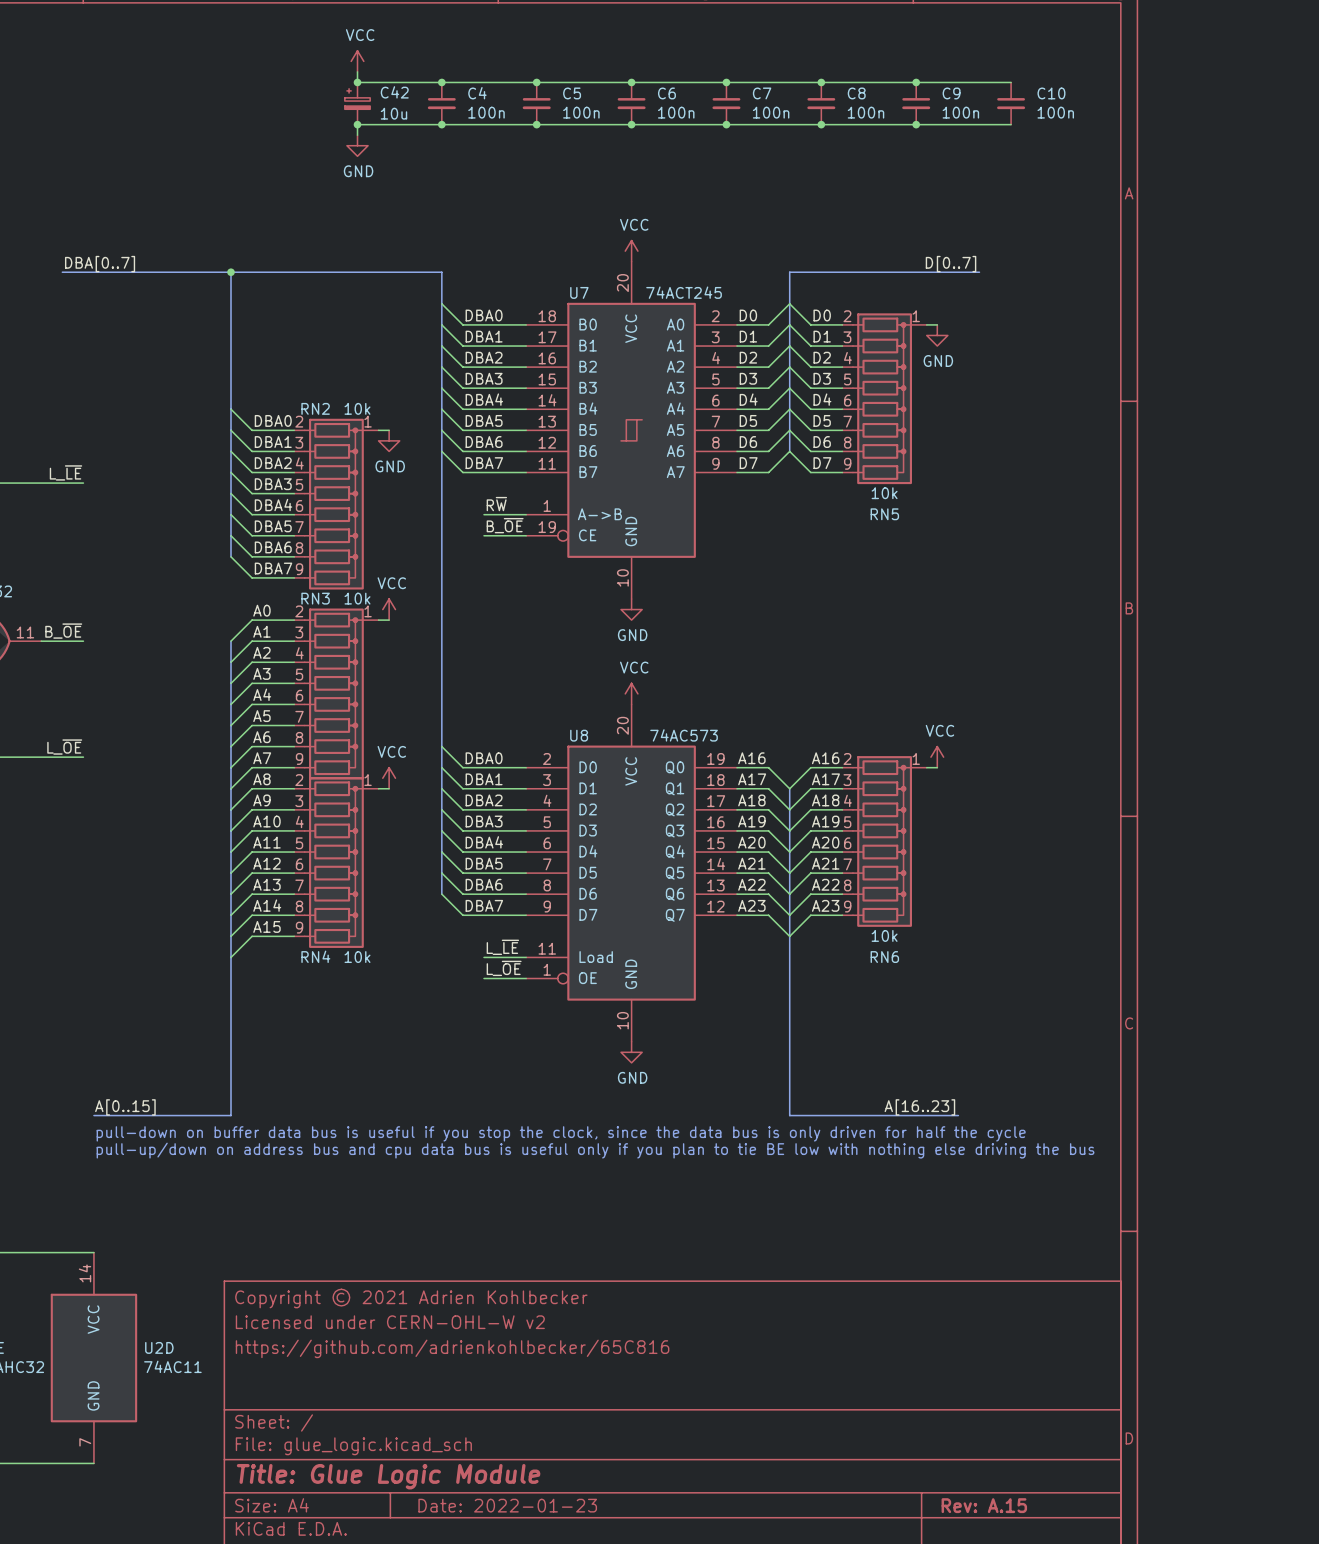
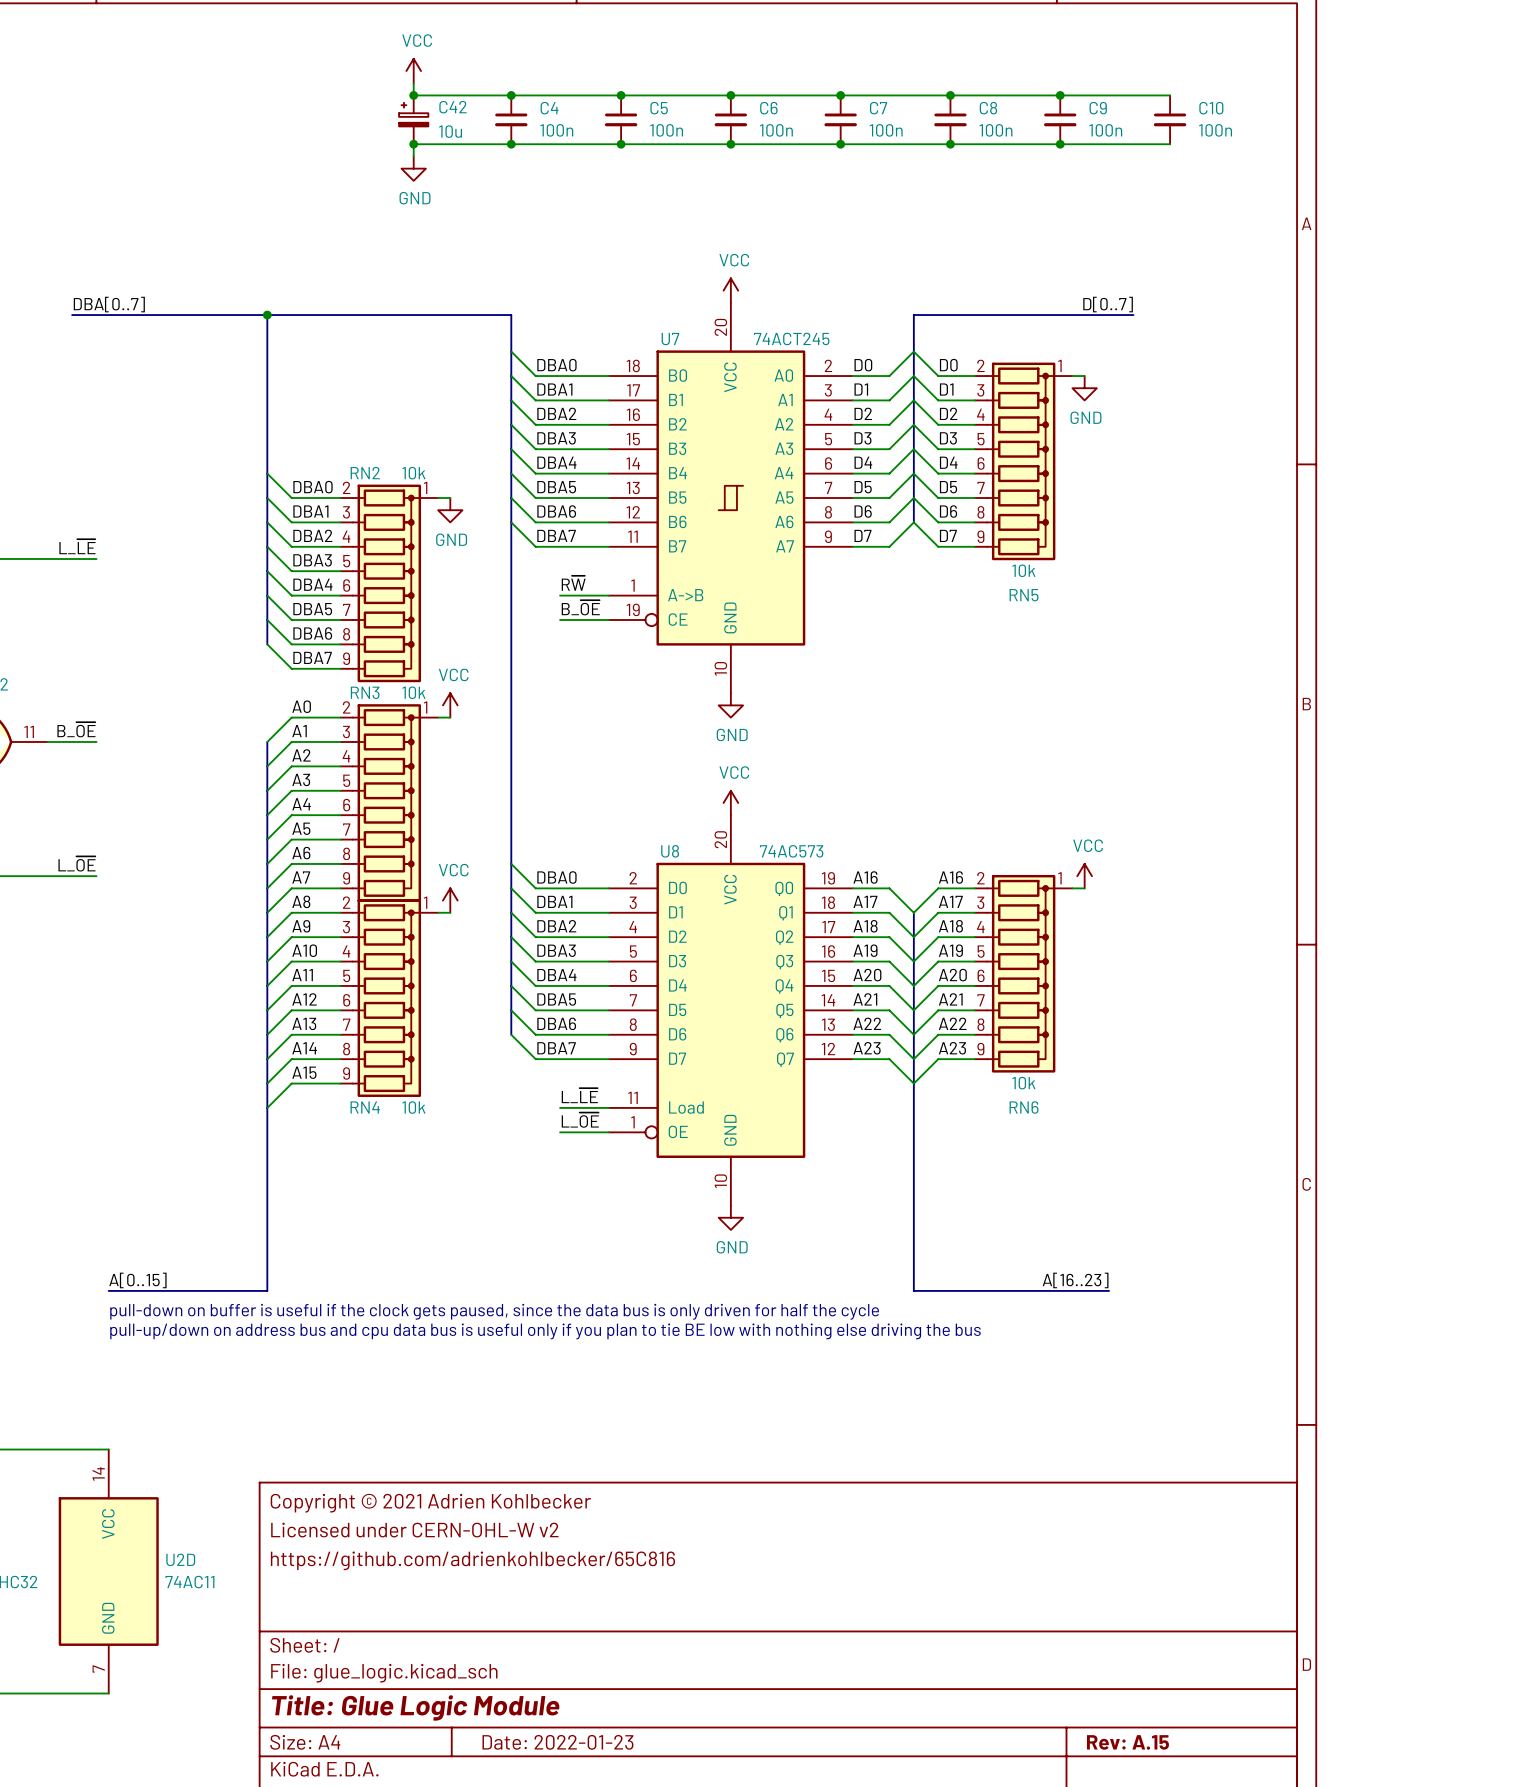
text: pull-down on buffer data bus is useful if you stop the clock, since the data bus is only driven for half the cycle (561, 1133) -> pull-down on buffer is useful if the clock gets paused, since the data bus is only driven for half the cycle (494, 1311)

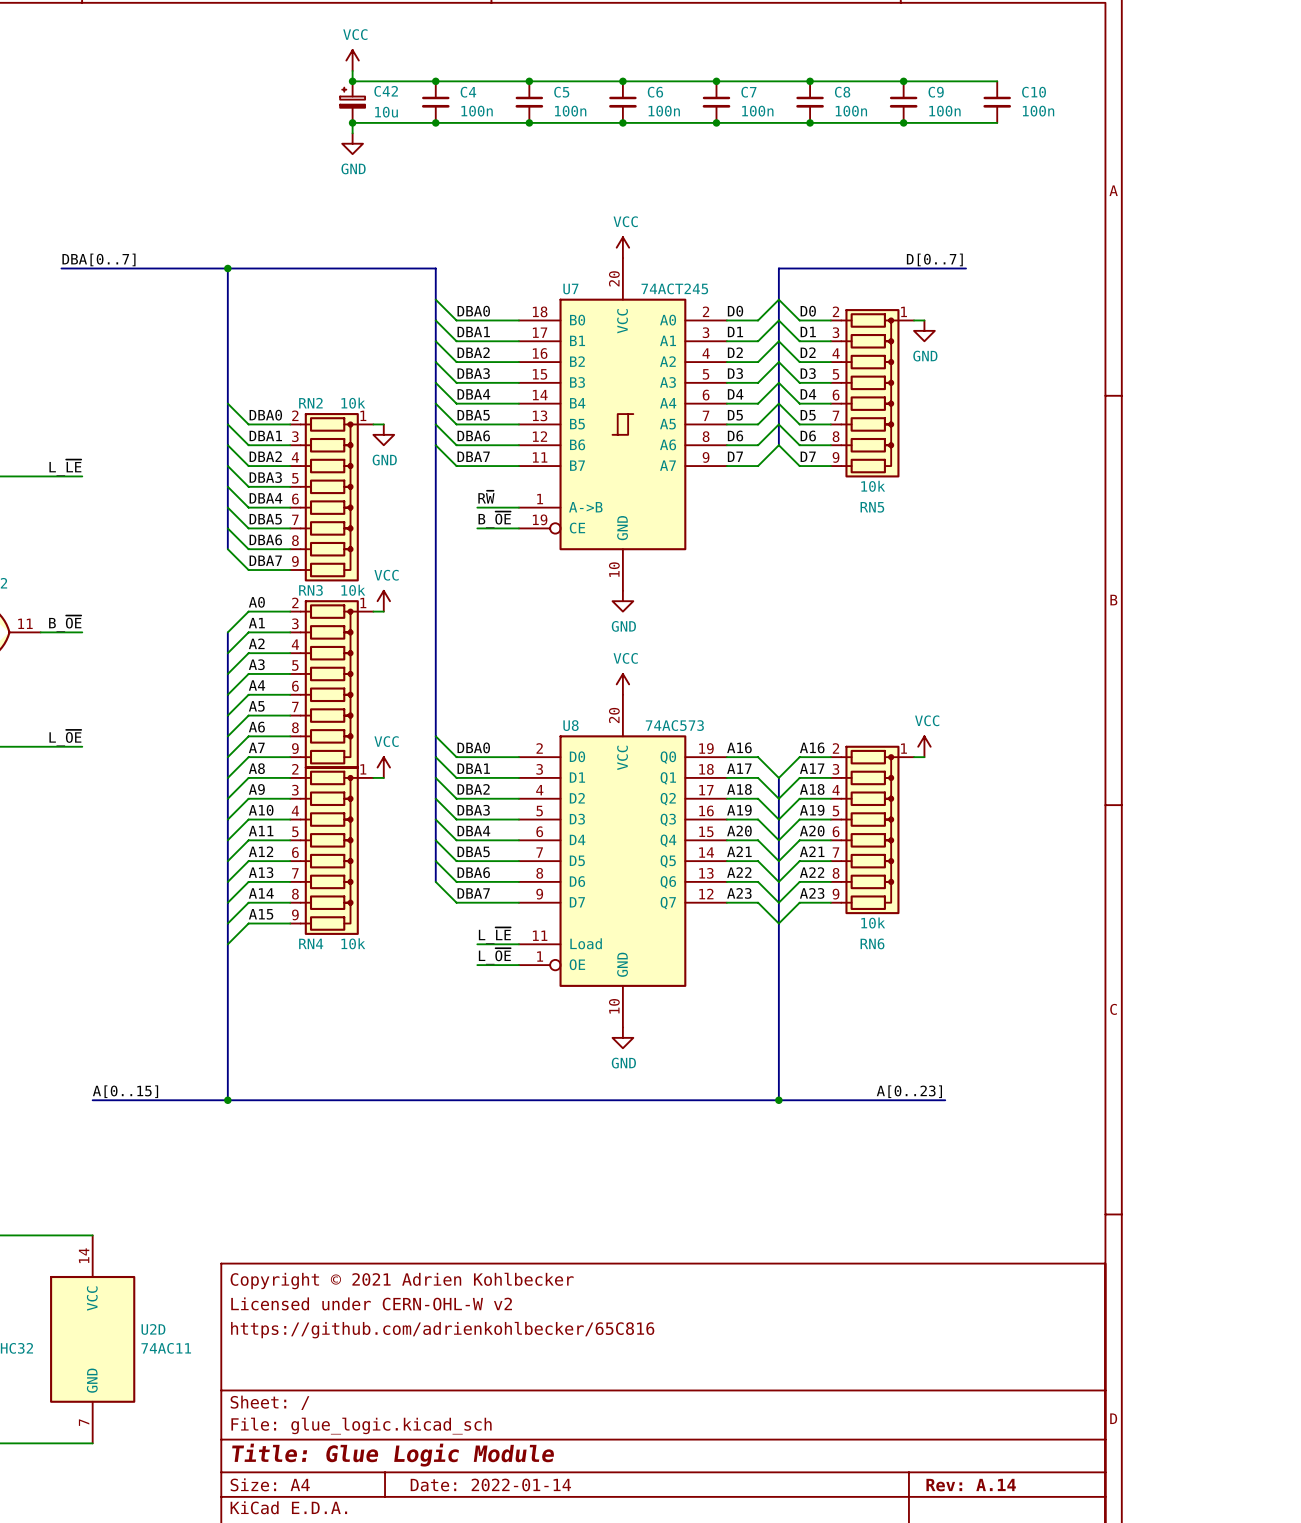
label: A[16..23] (1075, 1280) -> A[0..23] (909, 1091)
bus: none -> (227, 1100) (778, 1100)
junction: none -> (227, 1100)
junction: none -> (778, 1100)
text: pull-down on buffer is useful if the clock gets paused, since the data bus is only driven for half the cycle (494, 1311) -> none
text: pull-up/down on address bus and cpu data bus is useful only if you plan to tie BE low with nothing else driving the bus (545, 1331) -> none
title block: Date: 2022-01-23 (557, 1742) -> Date: 2022-01-14 (490, 1484)
title block: Rev: A.15 (1127, 1742) -> Rev: A.14 (971, 1485)

